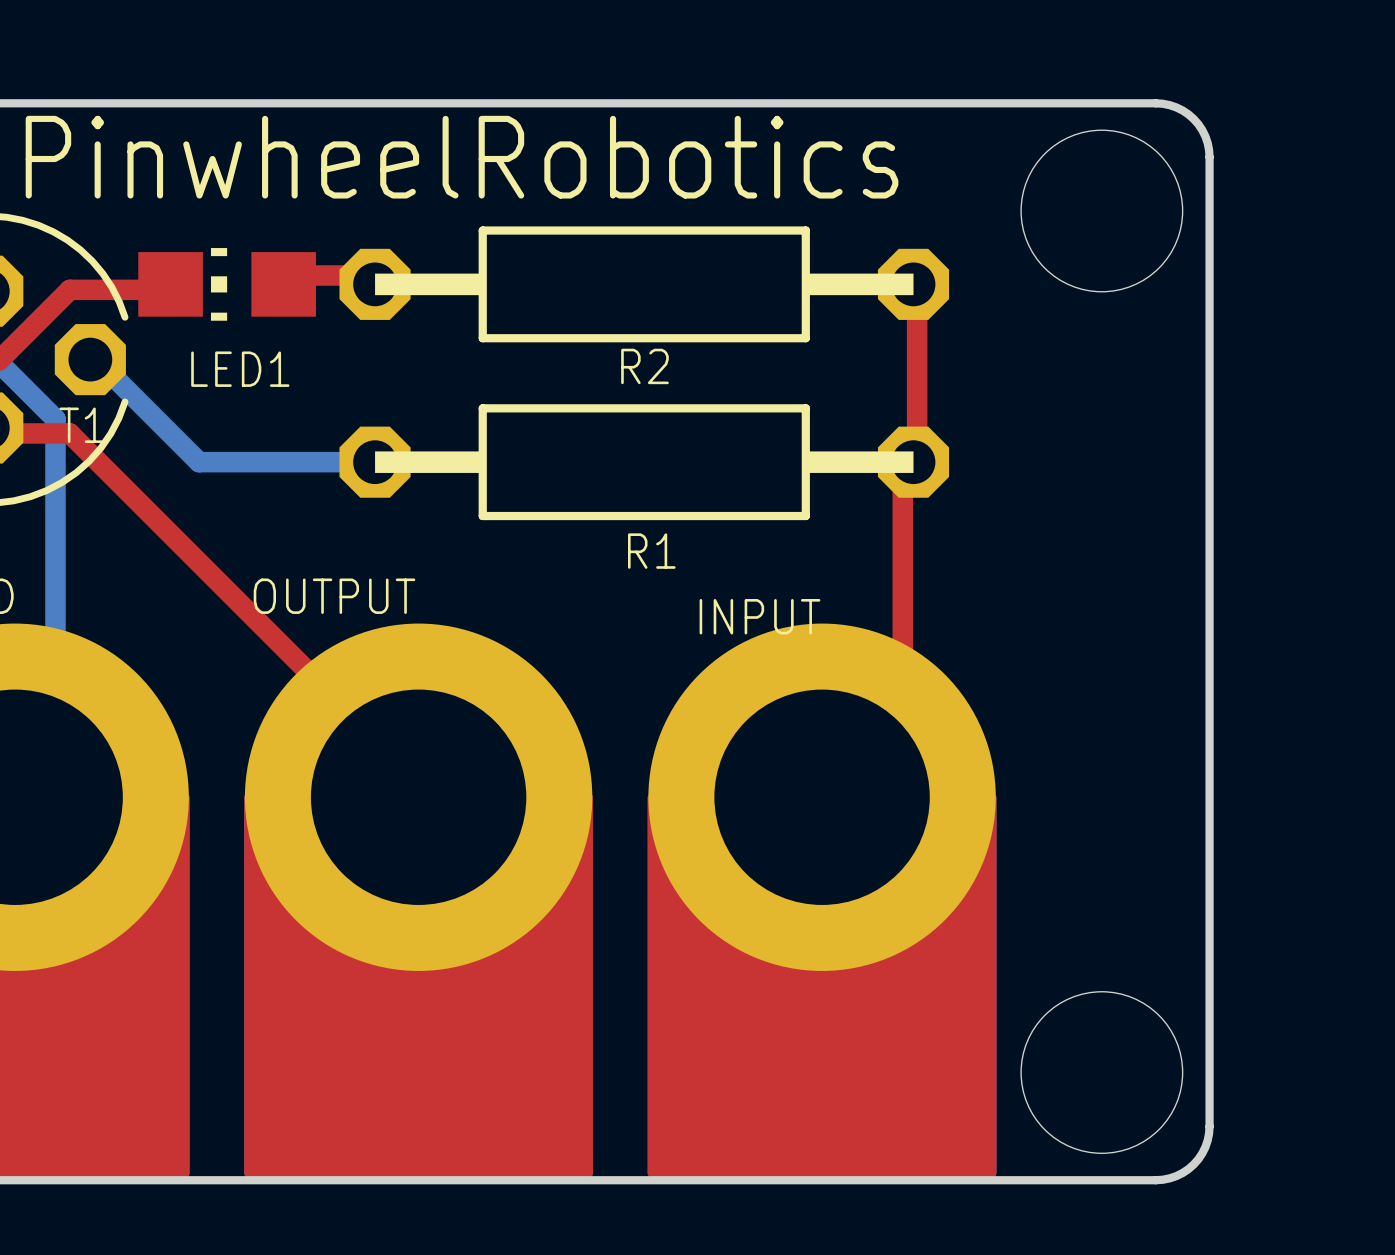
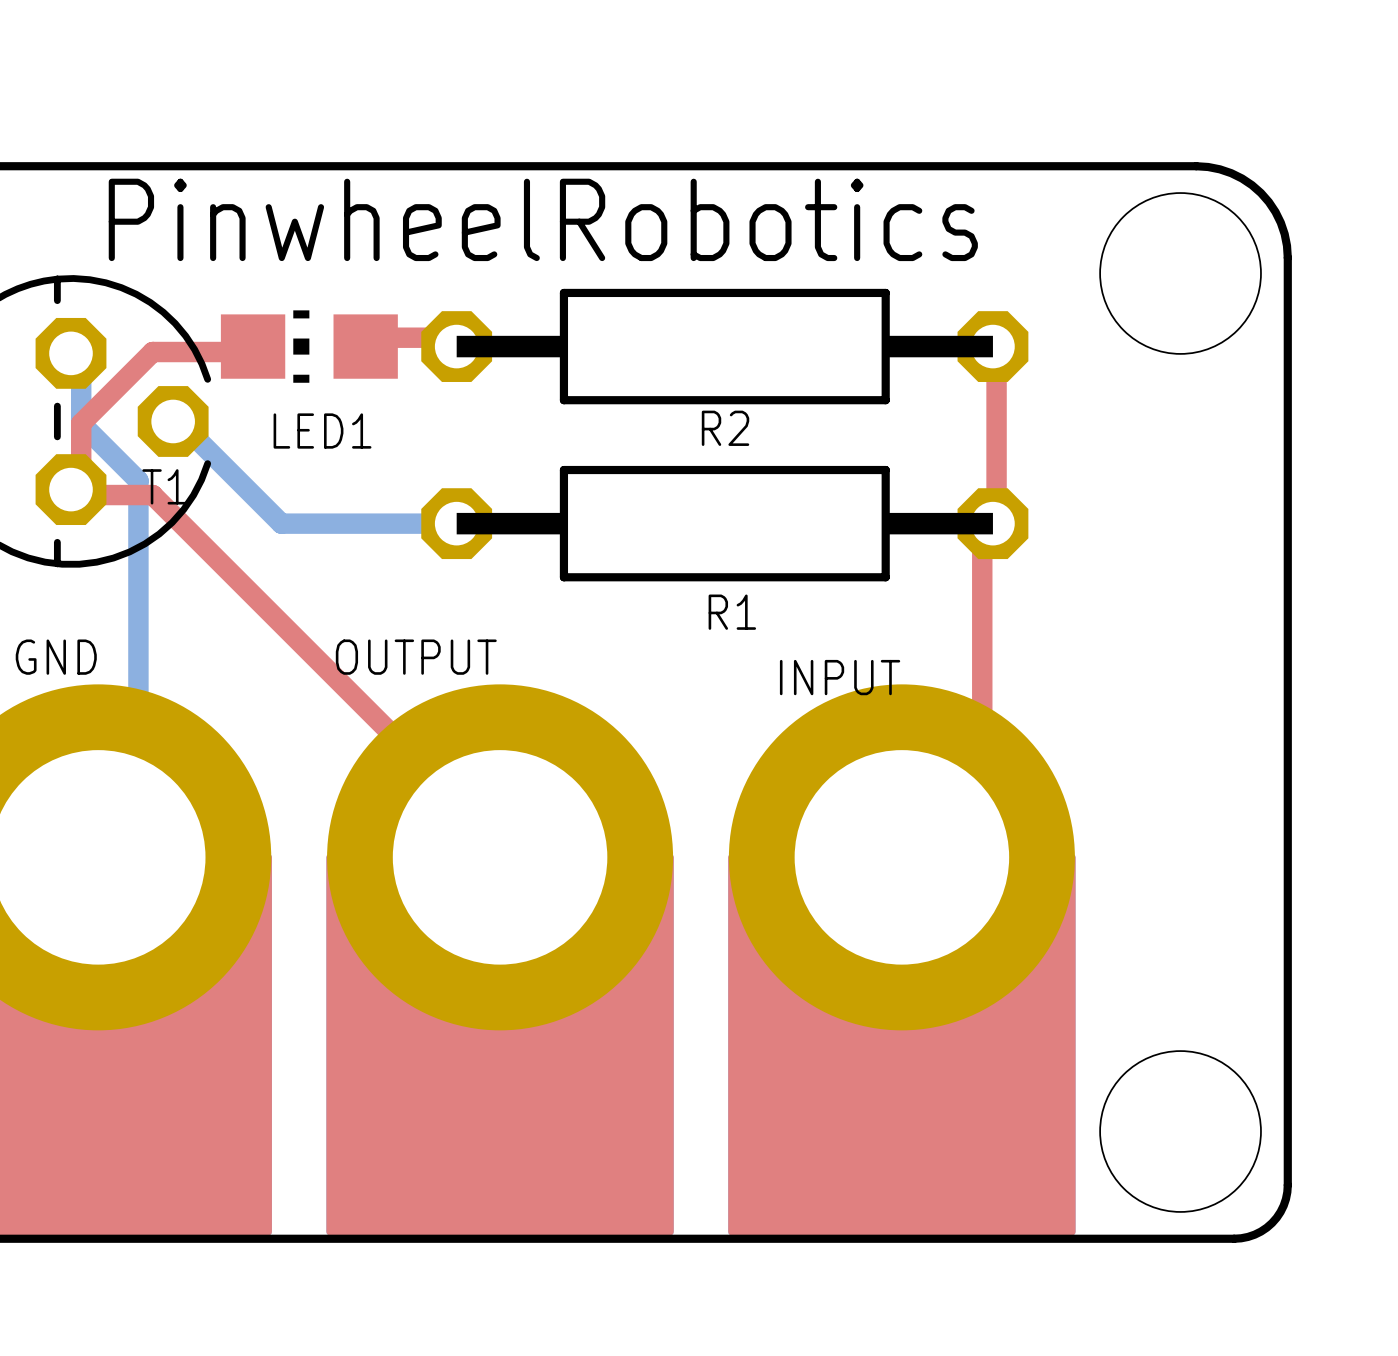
board edge: (1117, 103) (1169, 105) (1182, 110) (1193, 119) (1202, 130) (1207, 143) (1209, 195) -> (1196, 166) (1208, 167) (1231, 173) (1251, 185) (1260, 193) (1268, 202) (1280, 222) (1287, 245) (1287, 257)

